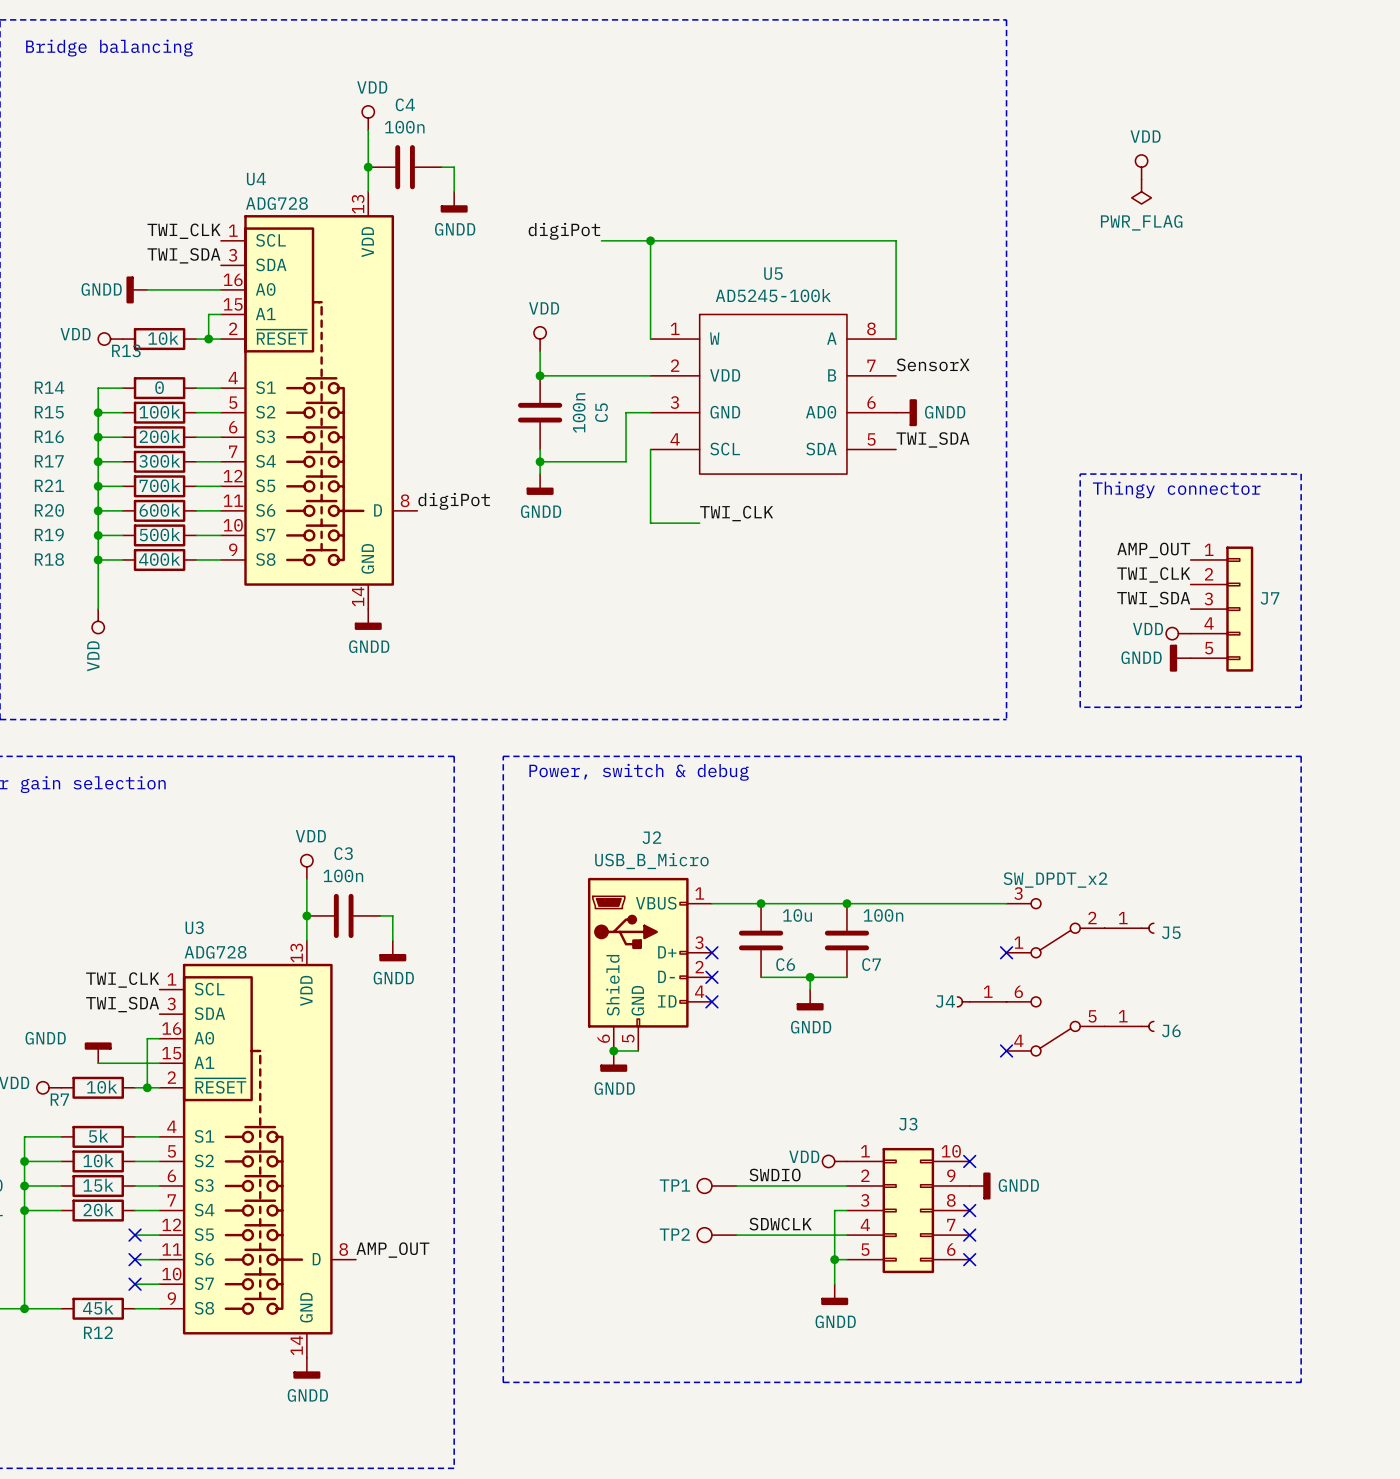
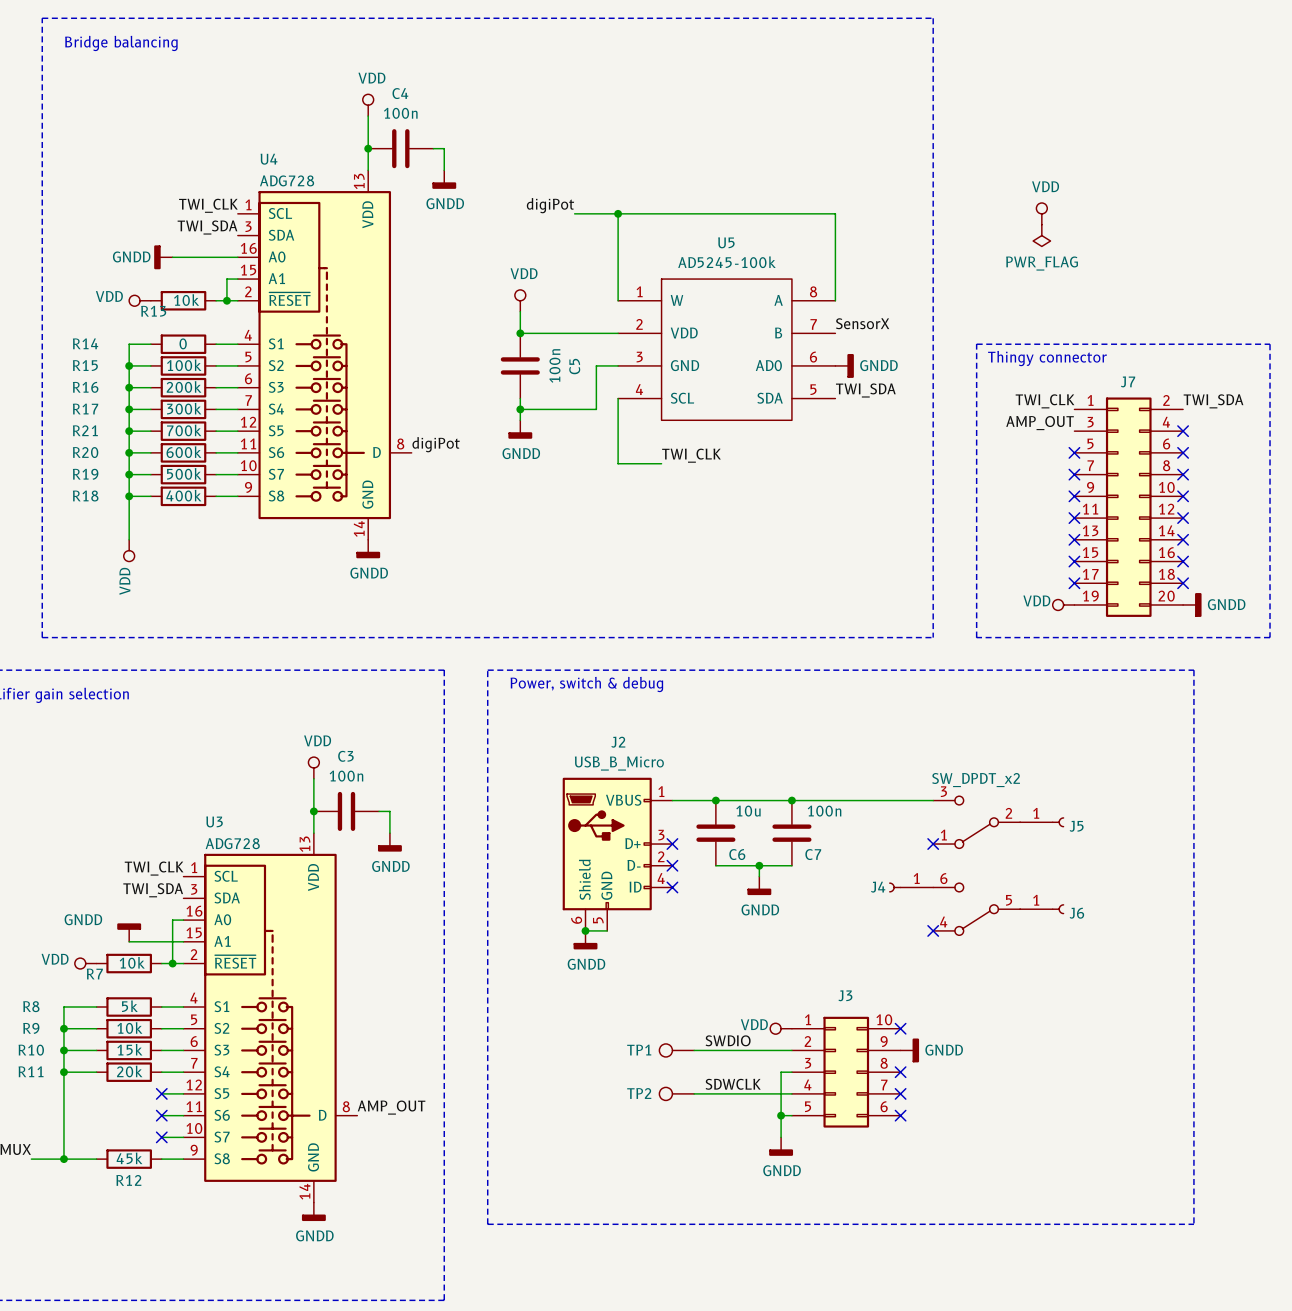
power symbol position: VDD (1141, 167) -> VDD (1041, 213)
power symbol position: PWR_FLAG (1141, 191) -> PWR_FLAG (1041, 235)
line: none -> (976, 344) (1270, 344) (1270, 637) (976, 637) (976, 344)
line: (1080, 474) (1301, 474) (1301, 707) (1080, 707) (1080, 474) -> none
no-connect mark: none -> (1183, 431)
text position: Thingy connector (1176, 489) -> Thingy connector (1047, 358)
no-connect mark: none -> (1074, 452)
no-connect mark: none -> (1183, 452)
no-connect mark: none -> (1074, 474)
no-connect mark: none -> (1183, 474)
J7 symbol: [1190, 546, 1254, 672] -> [1074, 397, 1184, 617]
label position: AMP_OUT (1153, 550) -> AMP_OUT (1040, 423)
no-connect mark: none -> (1074, 496)
no-connect mark: none -> (1183, 496)
label position: TWI_CLK (1153, 574) -> TWI_CLK (1045, 401)
no-connect mark: none -> (1074, 518)
no-connect mark: none -> (1183, 518)
J7 name position: J7 (1269, 598) -> J7 (1128, 381)
label position: TWI_SDA (1153, 599) -> TWI_SDA (1213, 401)
no-connect mark: none -> (1074, 539)
no-connect mark: none -> (1183, 539)
no-connect mark: none -> (1074, 561)
power symbol position: VDD (1178, 633) -> VDD (1063, 604)
no-connect mark: none -> (1183, 561)
no-connect mark: none -> (1074, 583)
power symbol rotation: 0° (1180, 658) -> 180° (1192, 604)
power symbol position: GNDD (1180, 658) -> GNDD (1192, 604)
no-connect mark: none -> (1183, 583)

